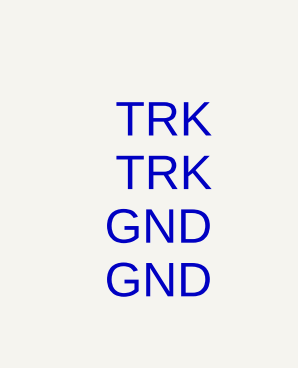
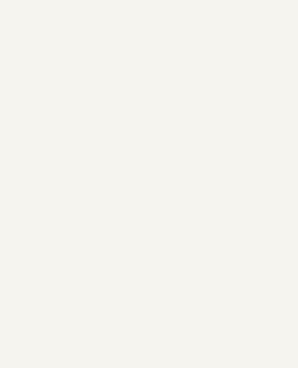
text: TRK (164, 118) -> none
text: TRK (164, 172) -> none
text: GND (158, 226) -> none
text: GND (158, 279) -> none

